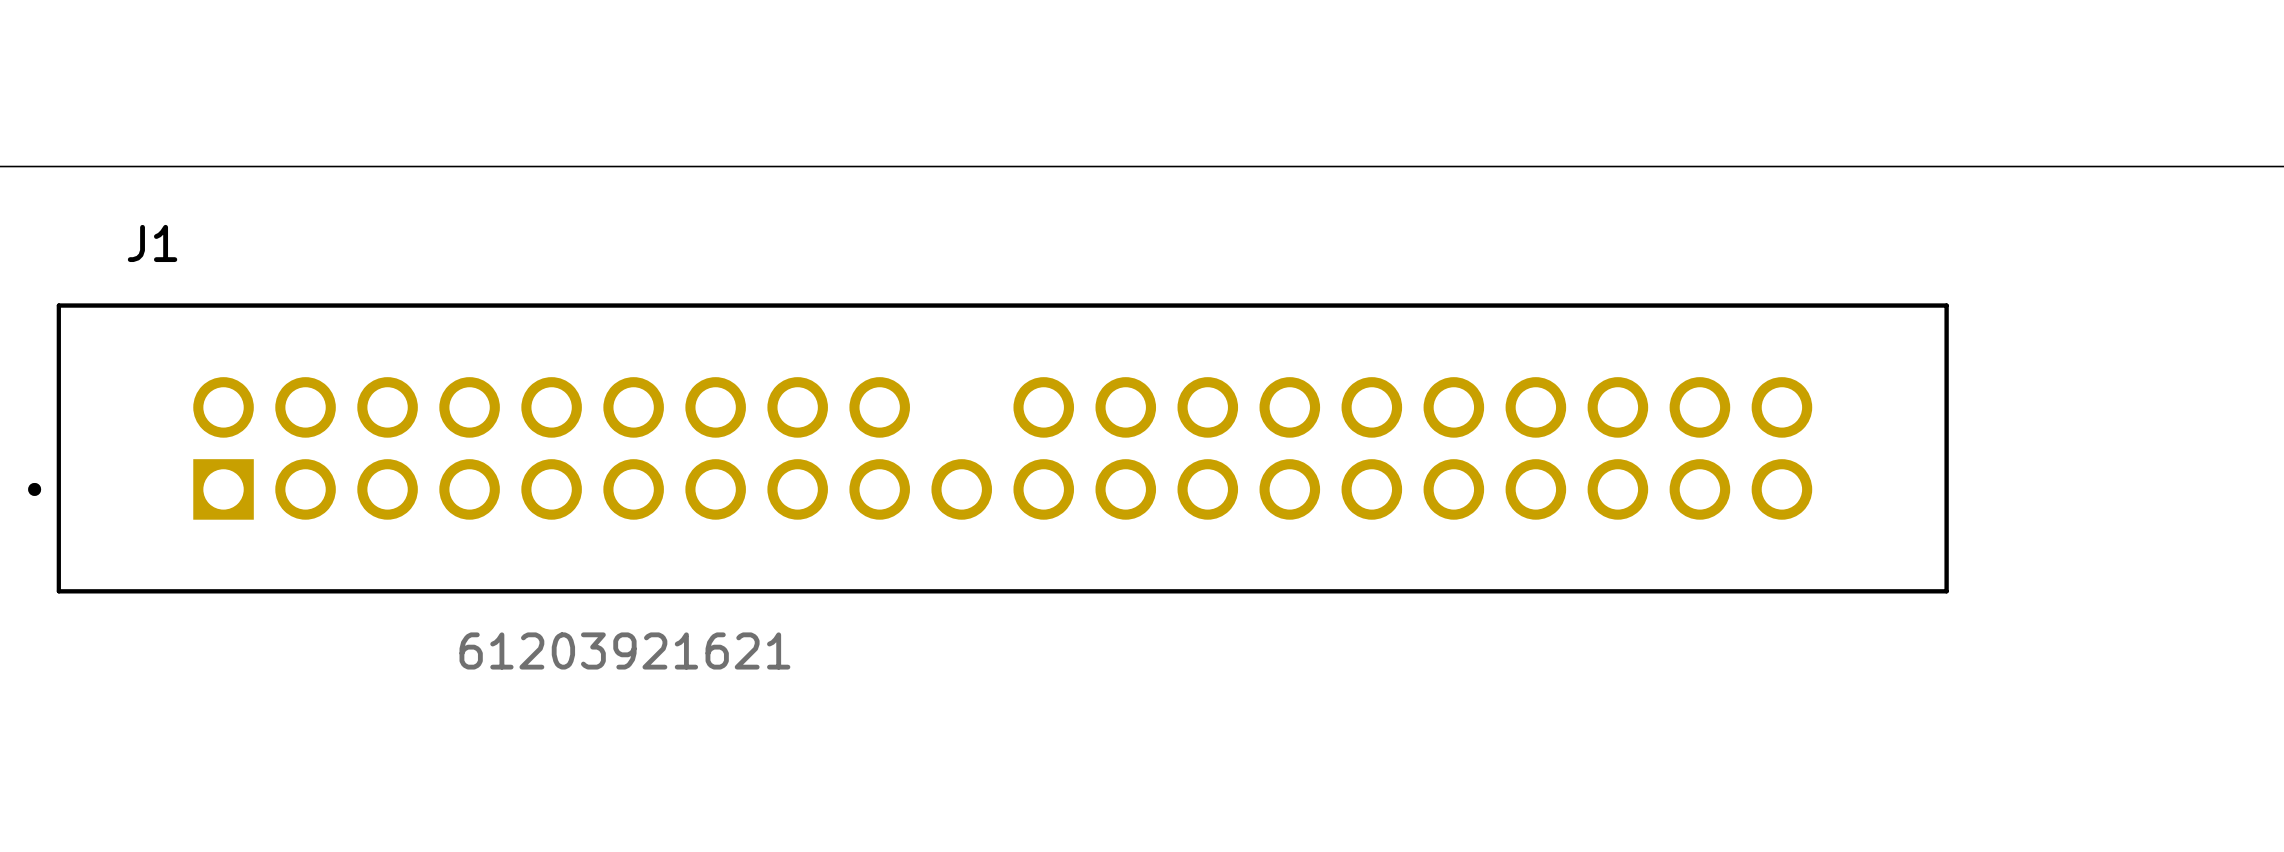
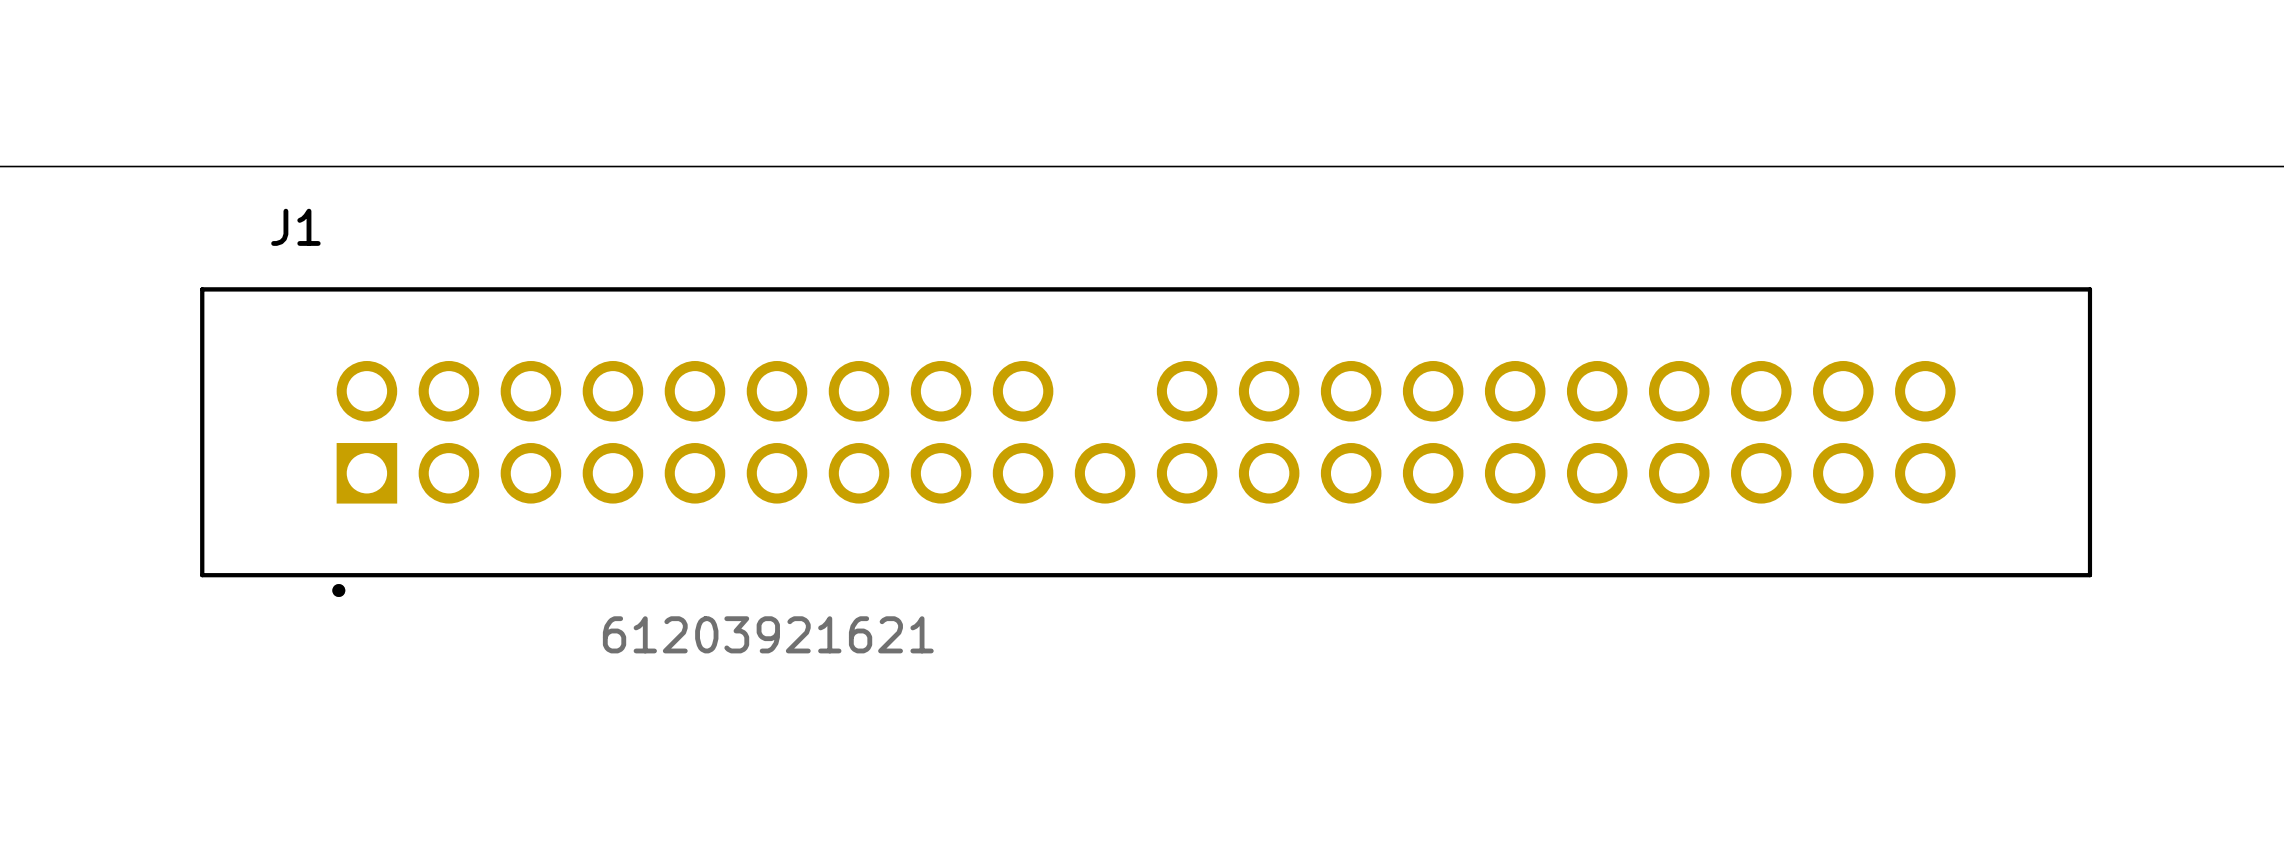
J1 footprint: [28, 303, 1949, 594] -> [200, 287, 2093, 597]

